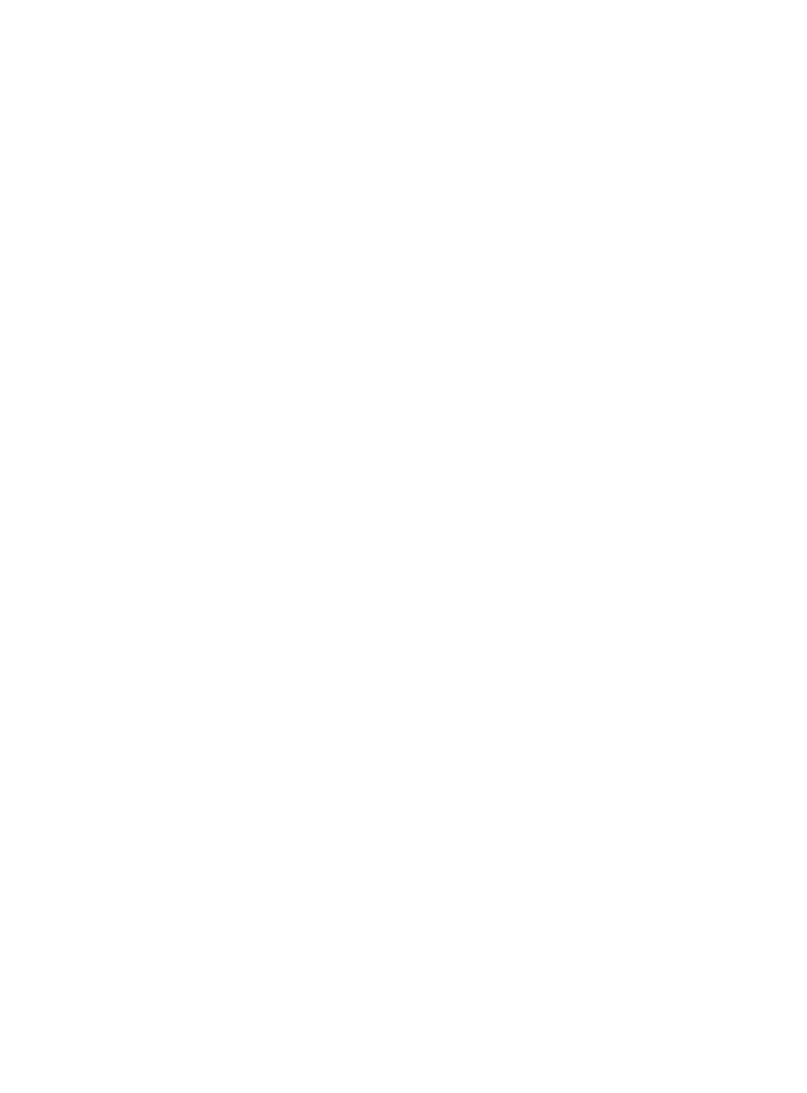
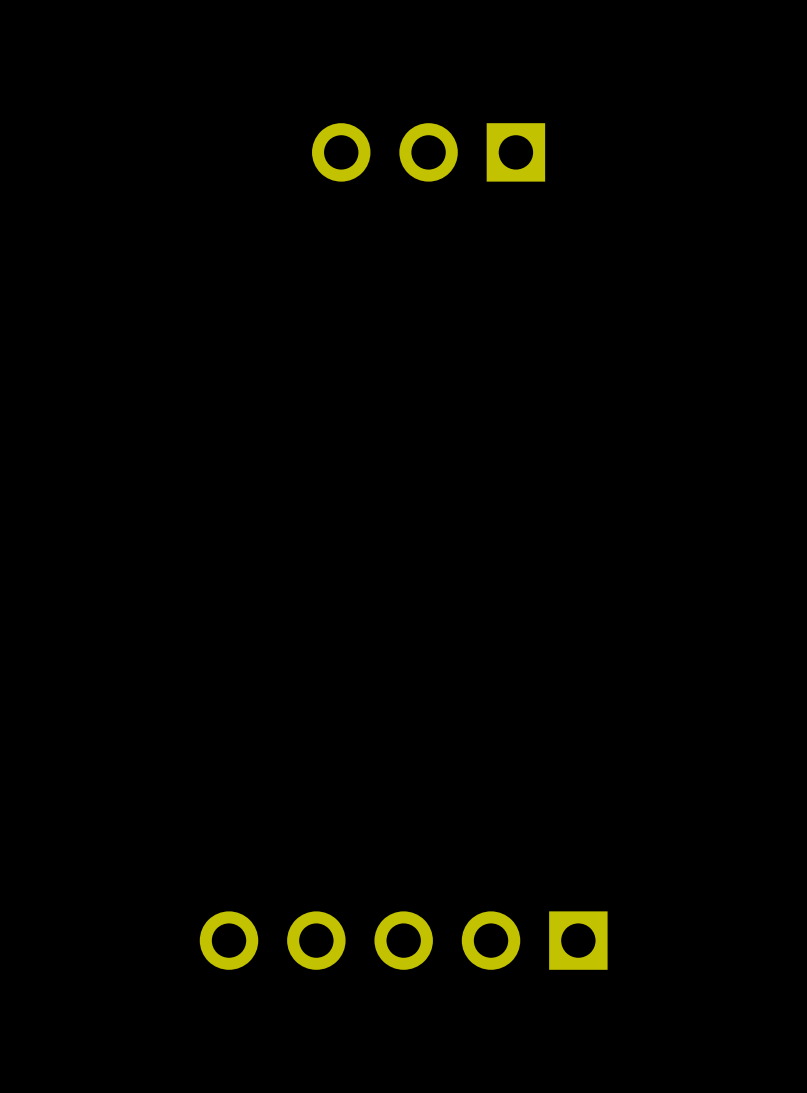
part: none -> (428, 152)
part: none -> (403, 940)

